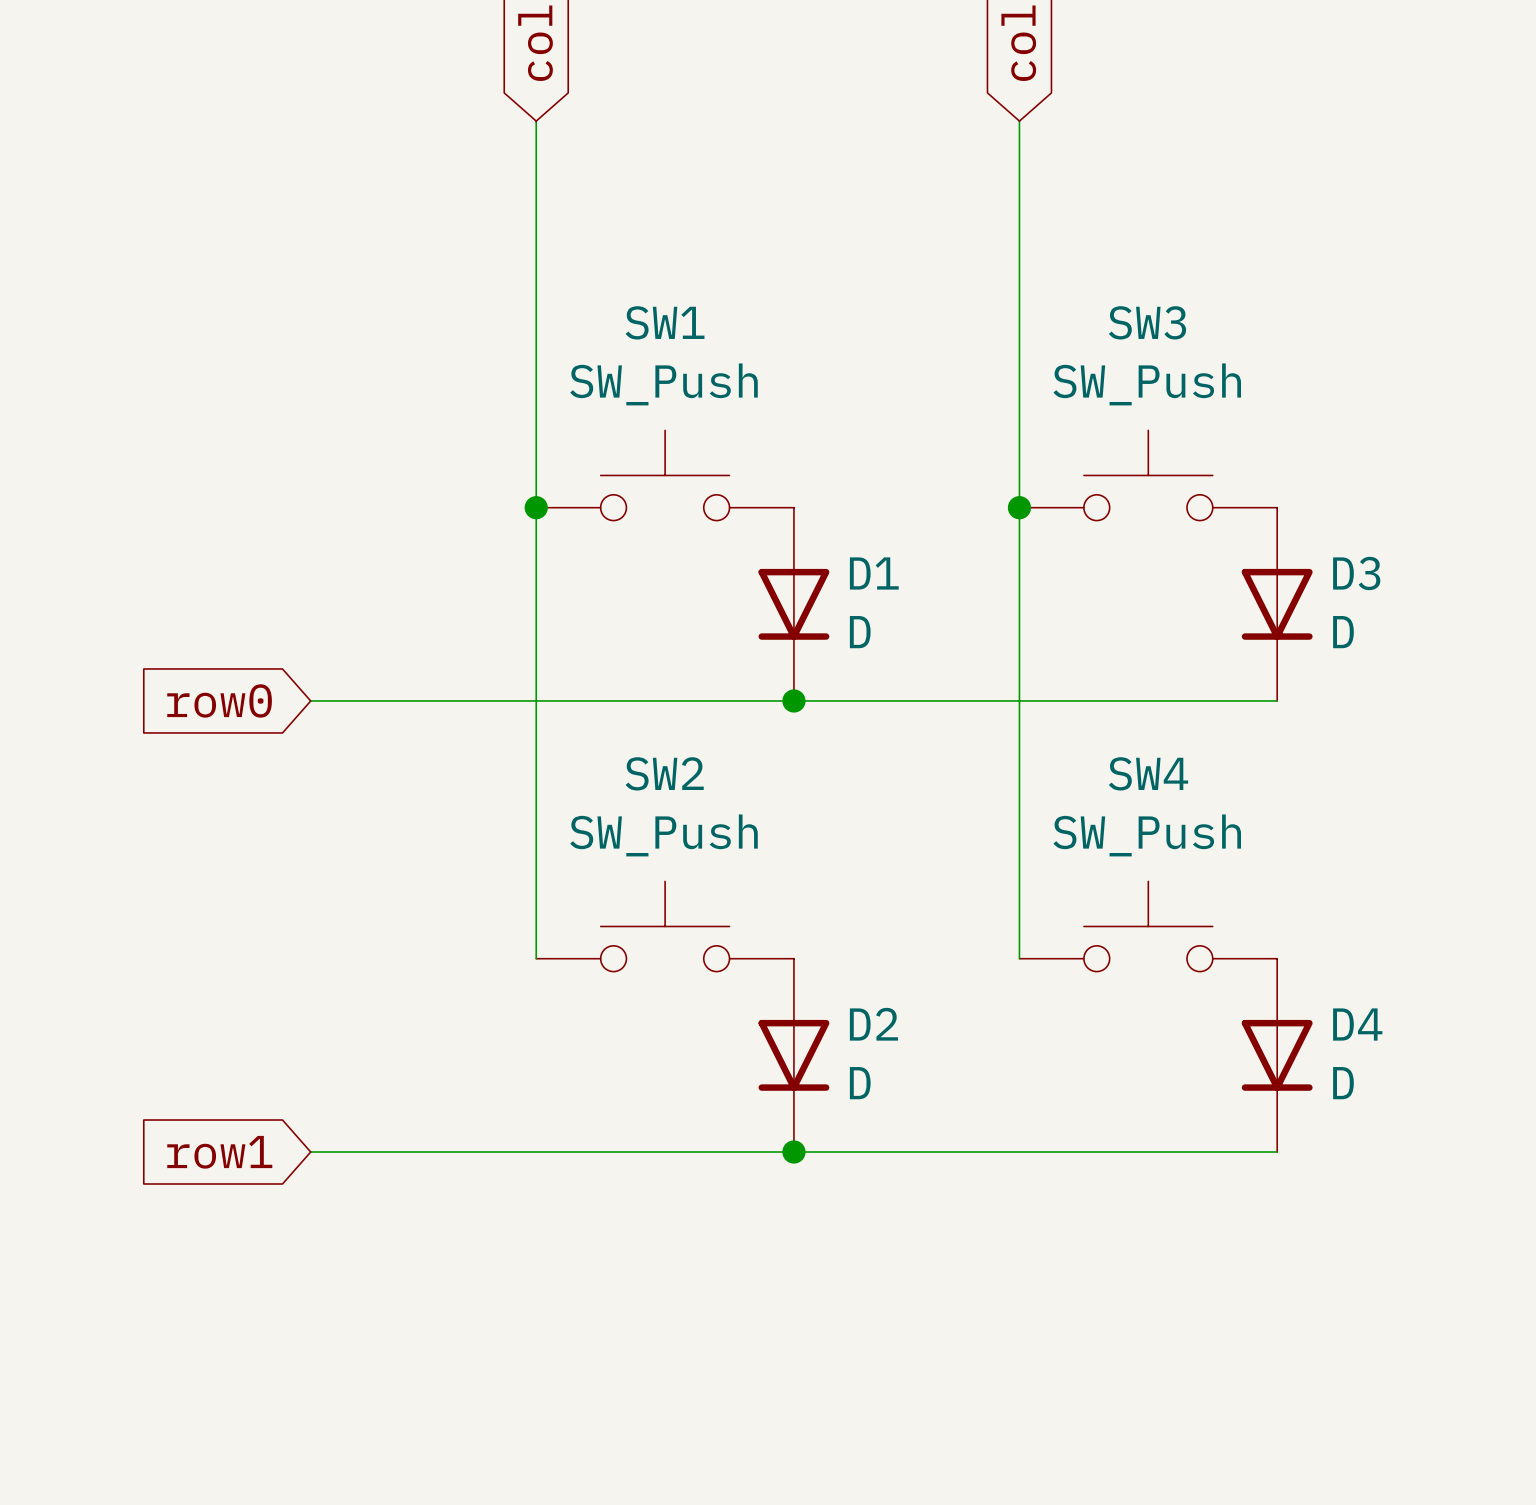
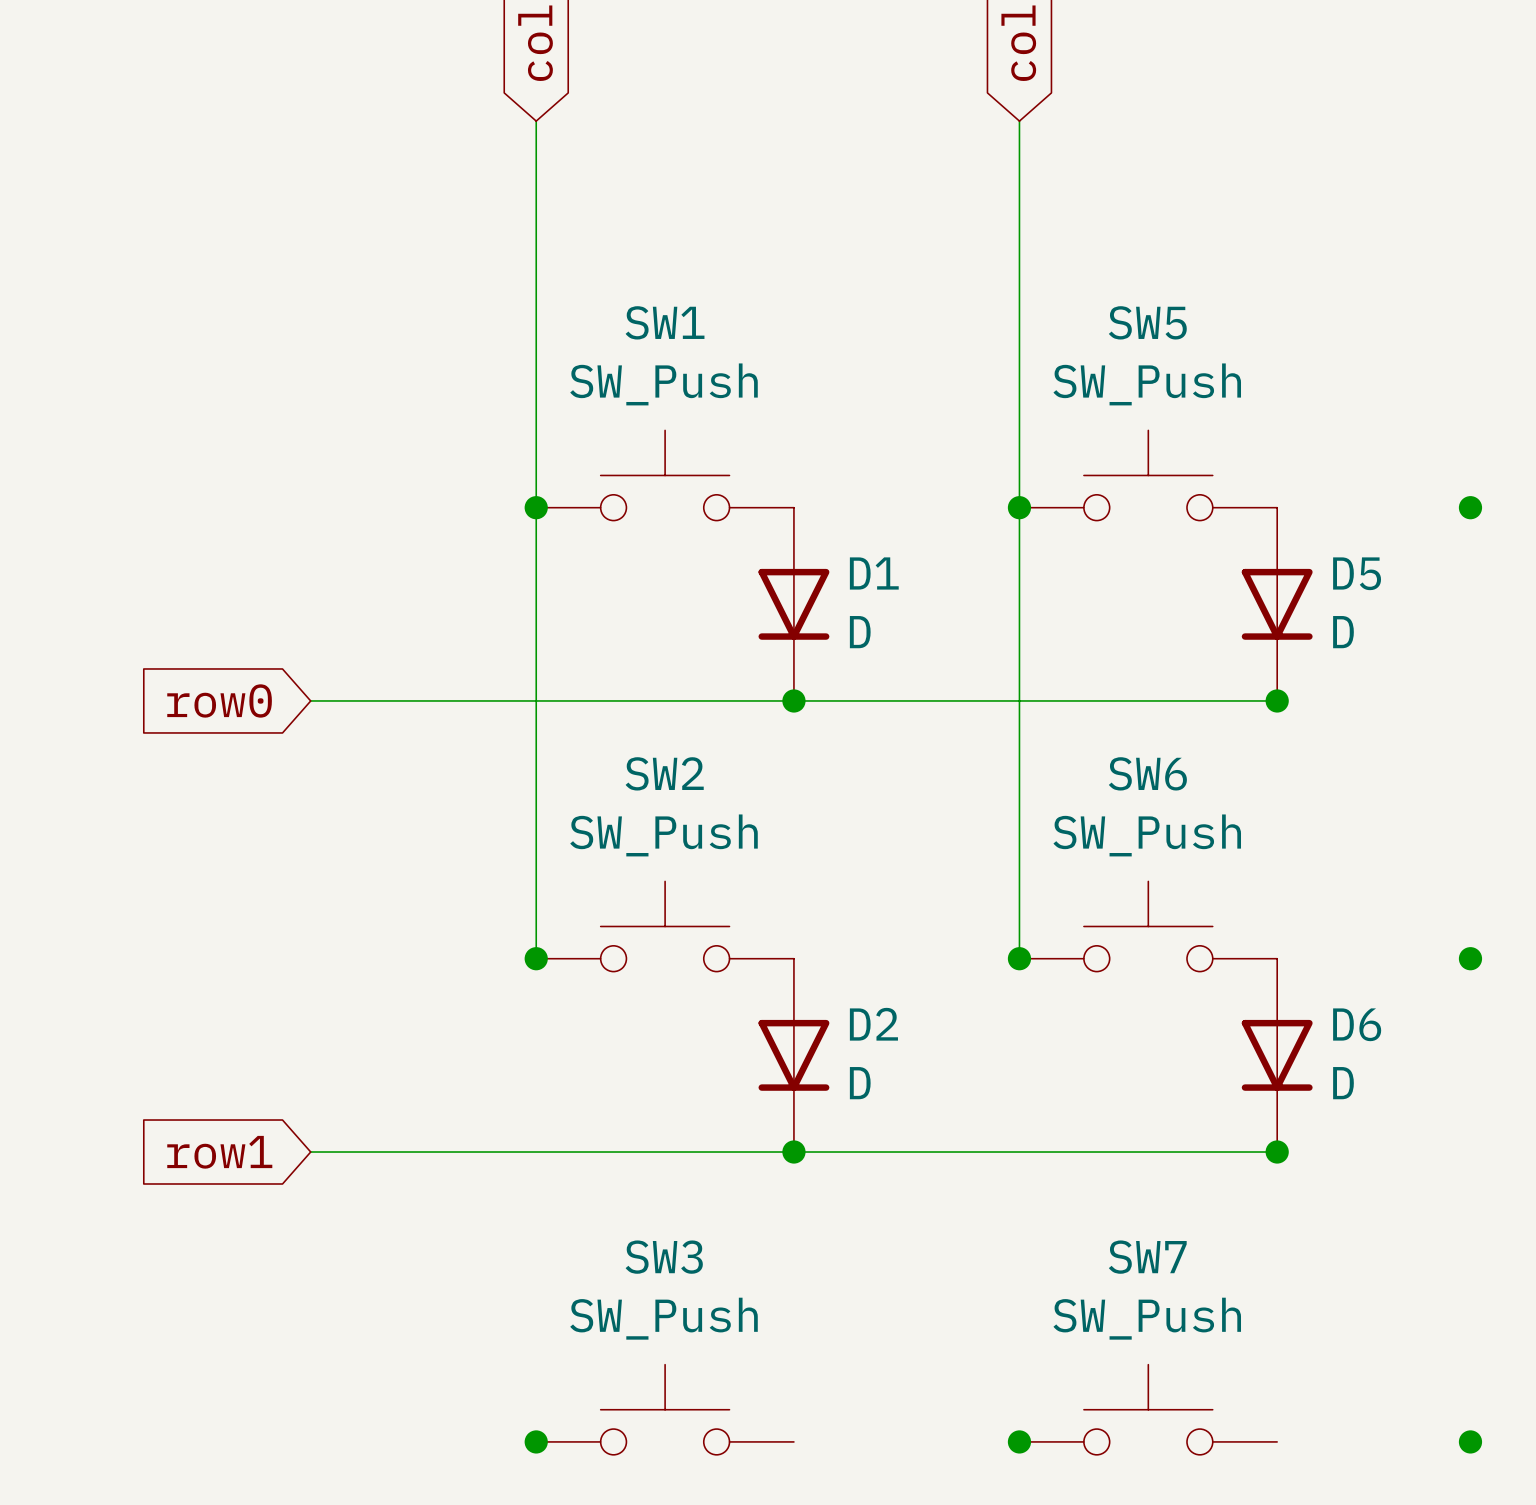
SW3 name: SW3 (1147, 322) -> SW5 (1147, 322)
junction: none -> (1470, 507)
D3 name: D3 (1356, 573) -> D5 (1357, 573)
junction: none -> (1277, 700)
SW4 name: SW4 (1148, 773) -> SW6 (1147, 773)
junction: none -> (536, 958)
junction: none -> (1019, 958)
junction: none -> (1470, 958)
D4 name: D4 (1357, 1024) -> D6 (1357, 1024)
junction: none -> (1277, 1152)
SW3: none -> SW_Push (665, 1409)
SW7: none -> SW_Push (1148, 1409)
junction: none -> (536, 1441)
junction: none -> (1019, 1441)
junction: none -> (1470, 1441)

